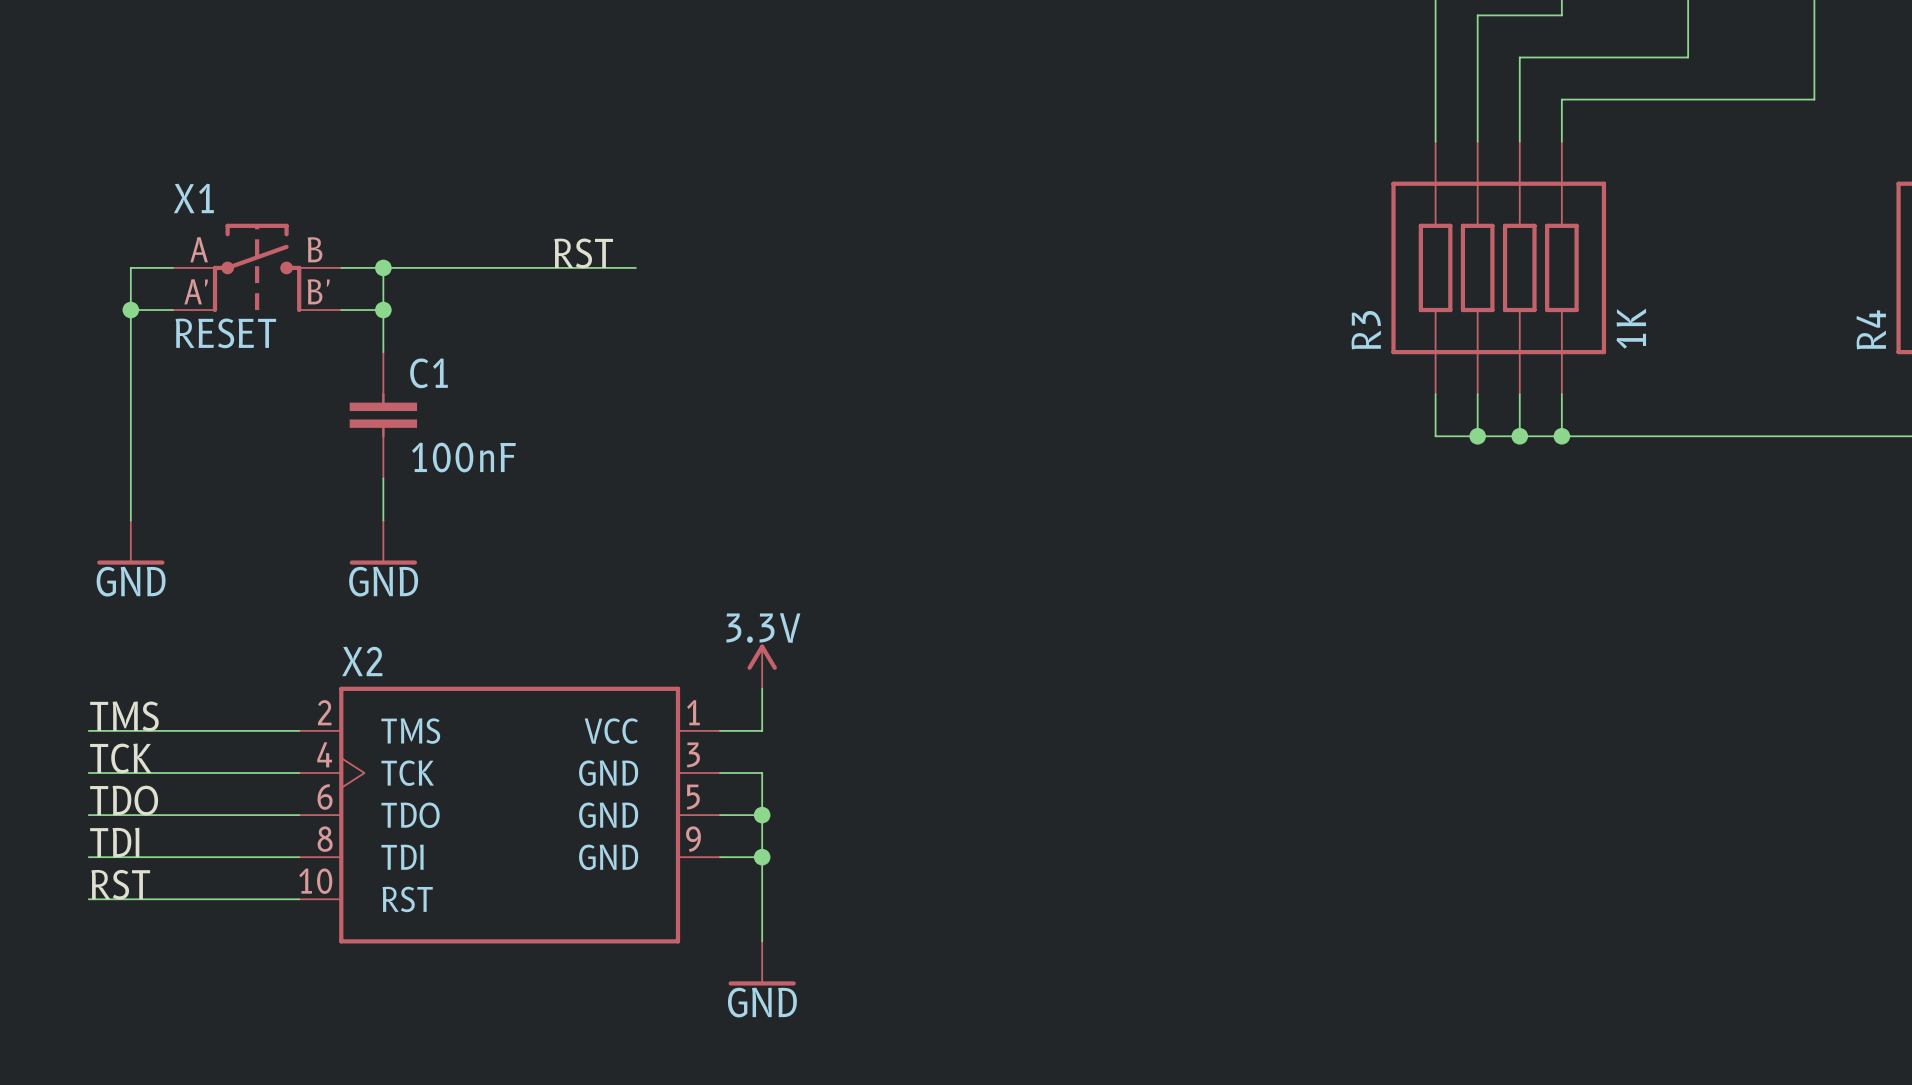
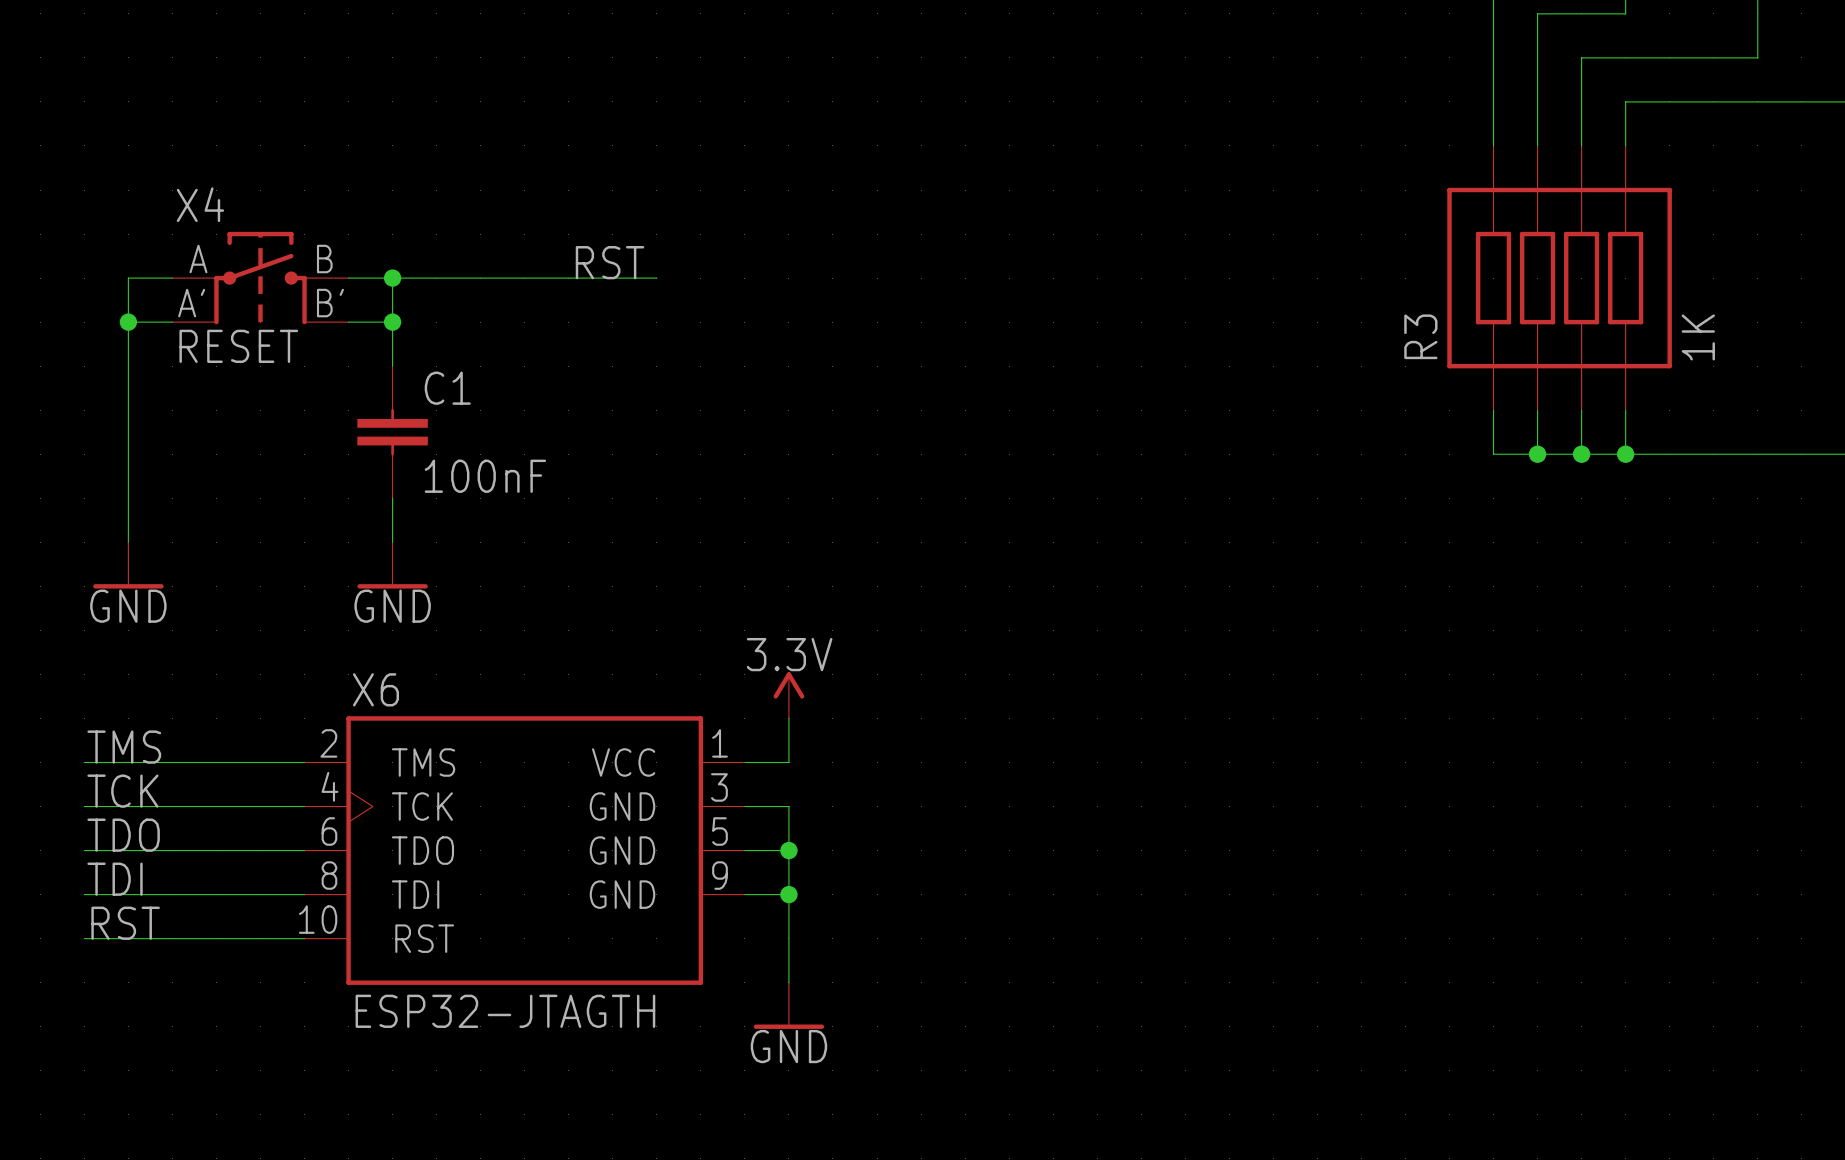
X1 name: X1 (193, 198) -> X4 (200, 204)
X2 name: X2 (362, 661) -> X6 (375, 689)
X2 value: none -> ESP32-JTAGTH (505, 1011)

